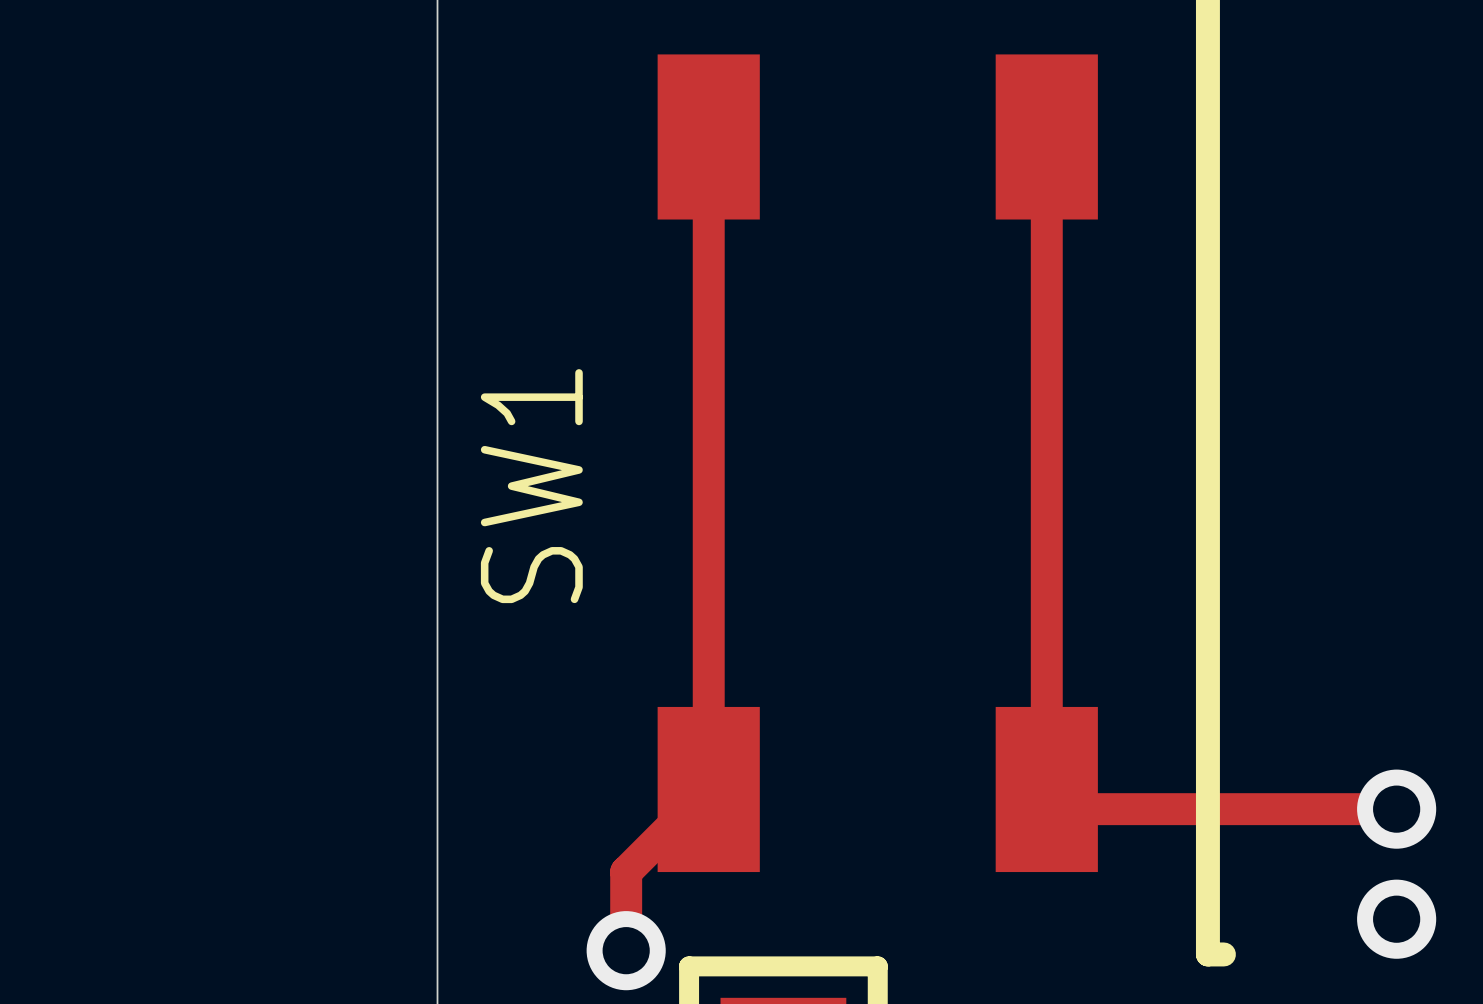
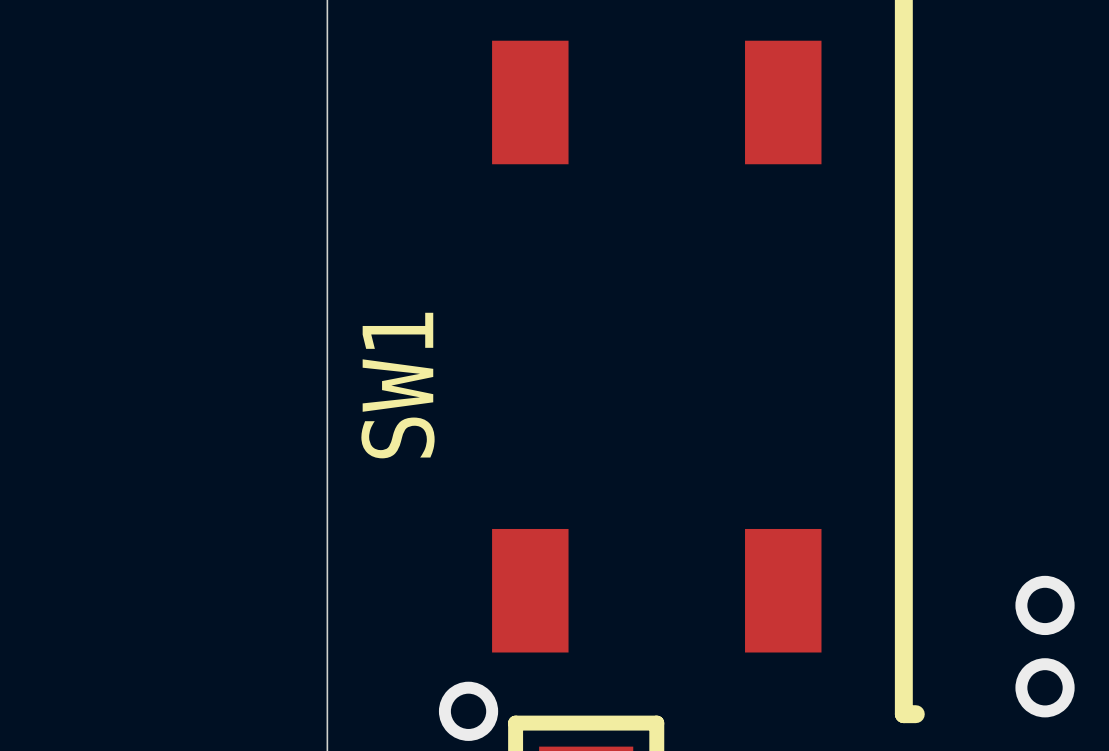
track: (708, 136) (708, 789) (626, 872) (626, 950) -> none
track: (1046, 136) (1046, 789) (1066, 809) (1396, 809) -> none

